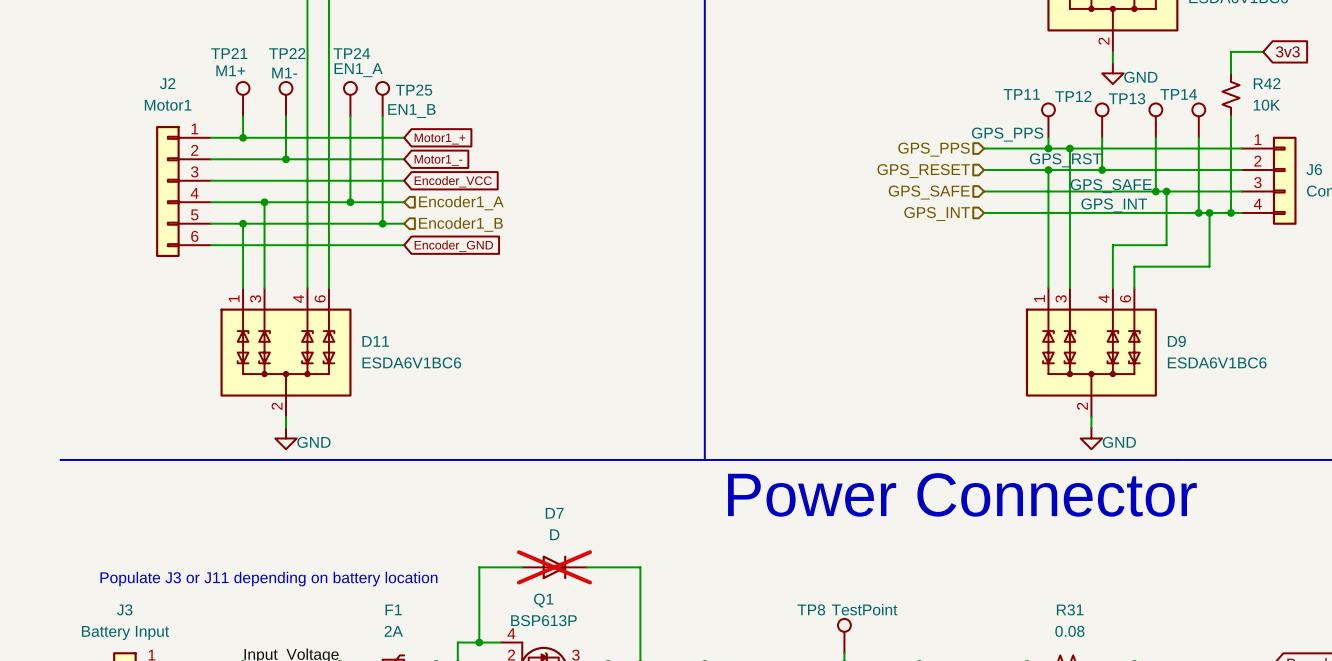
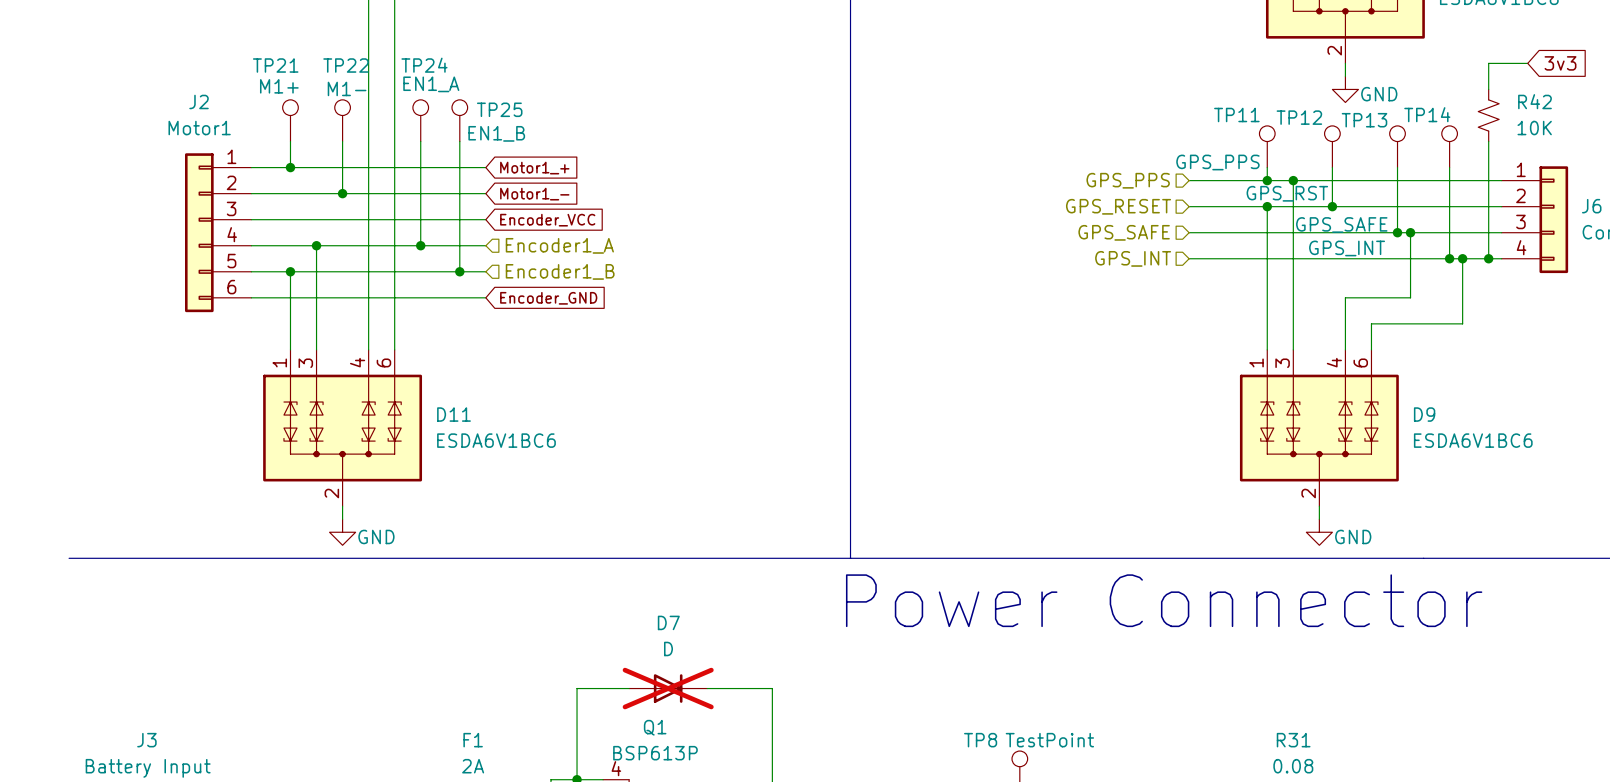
text: Populate J3 or J11 depending on battery location (268, 579) -> none

